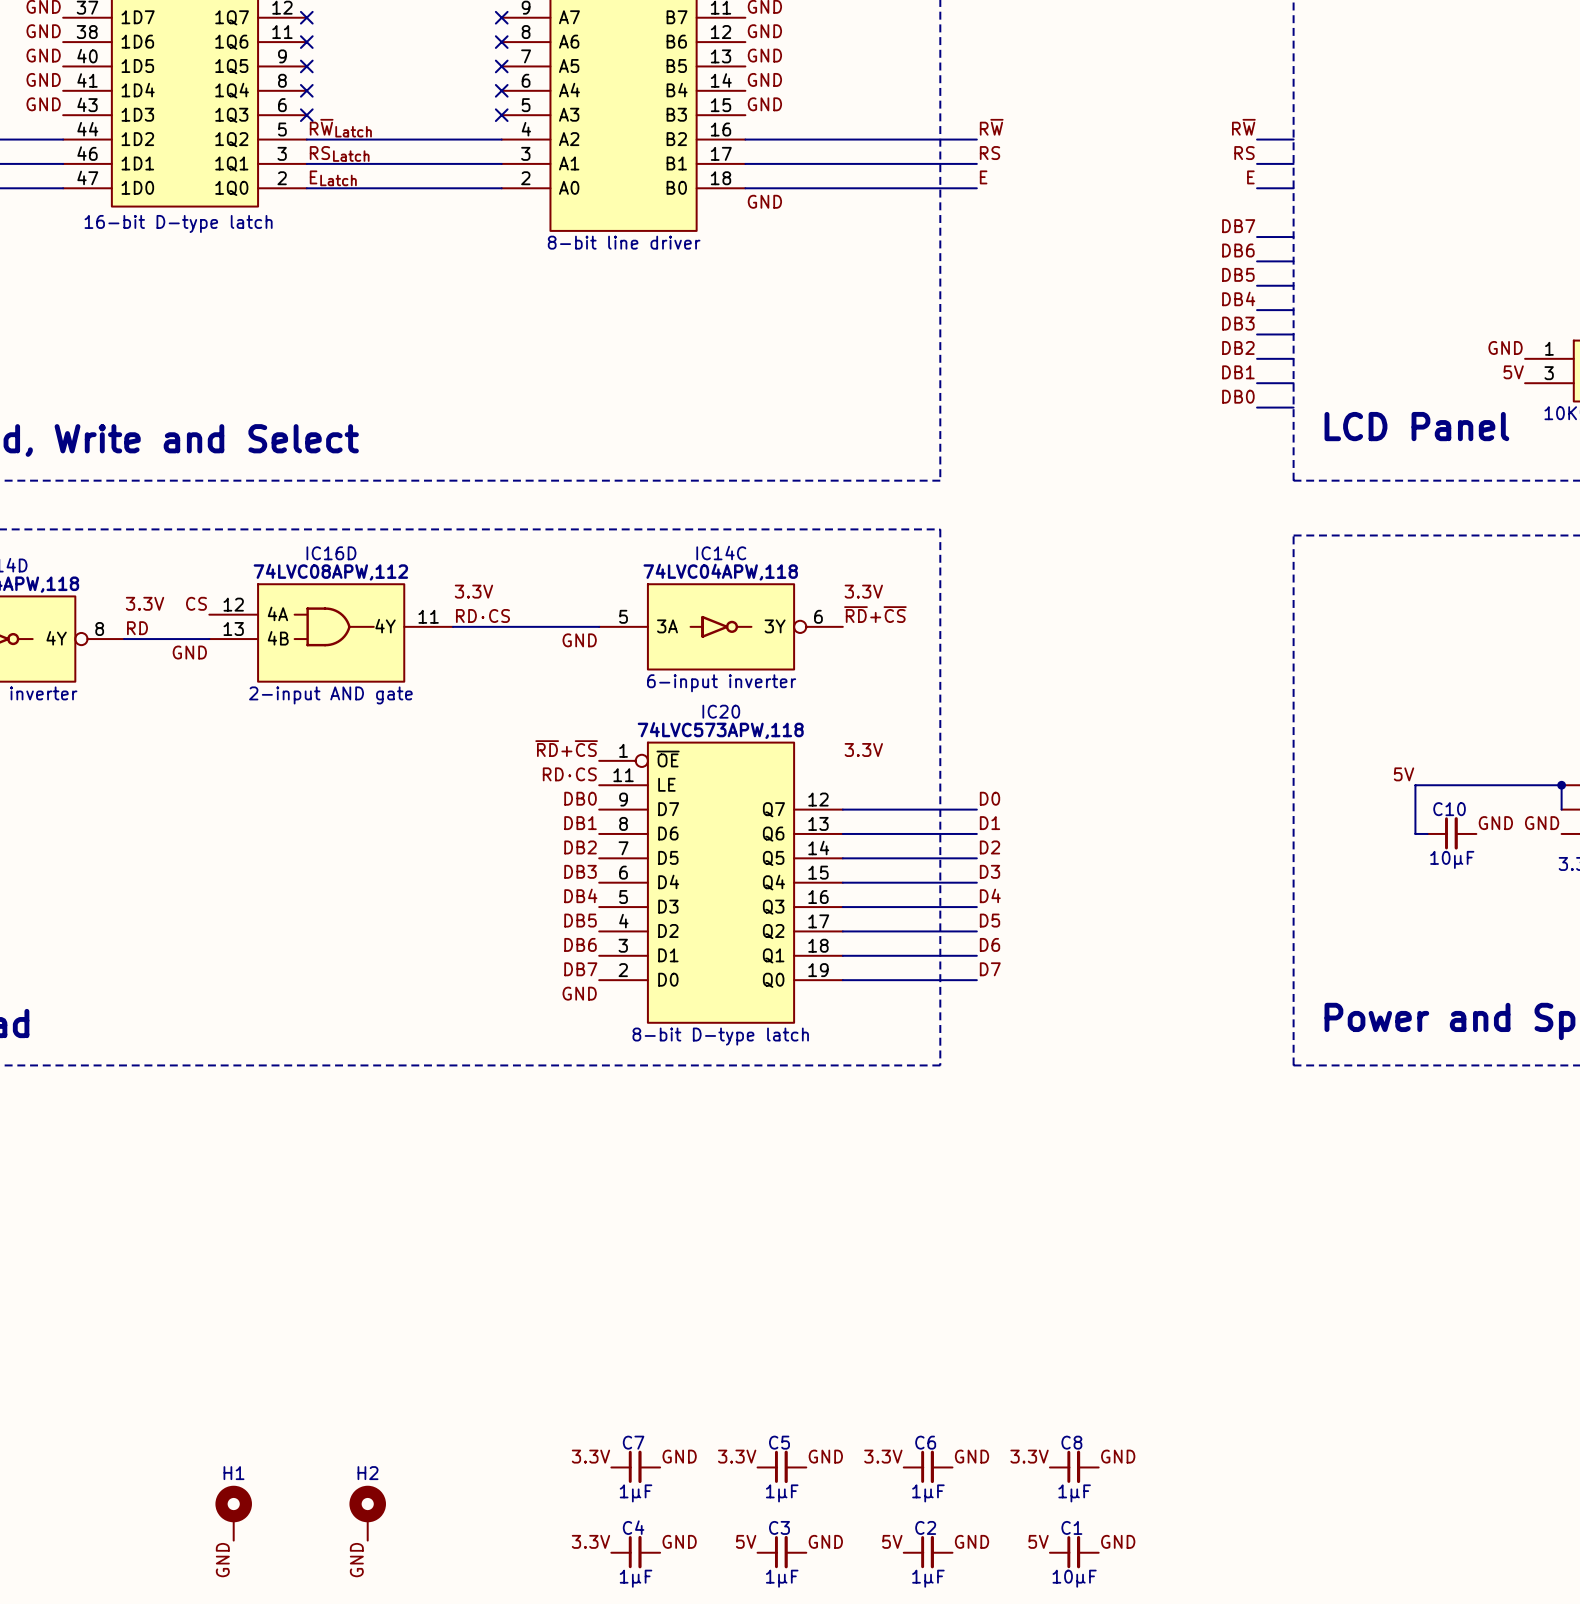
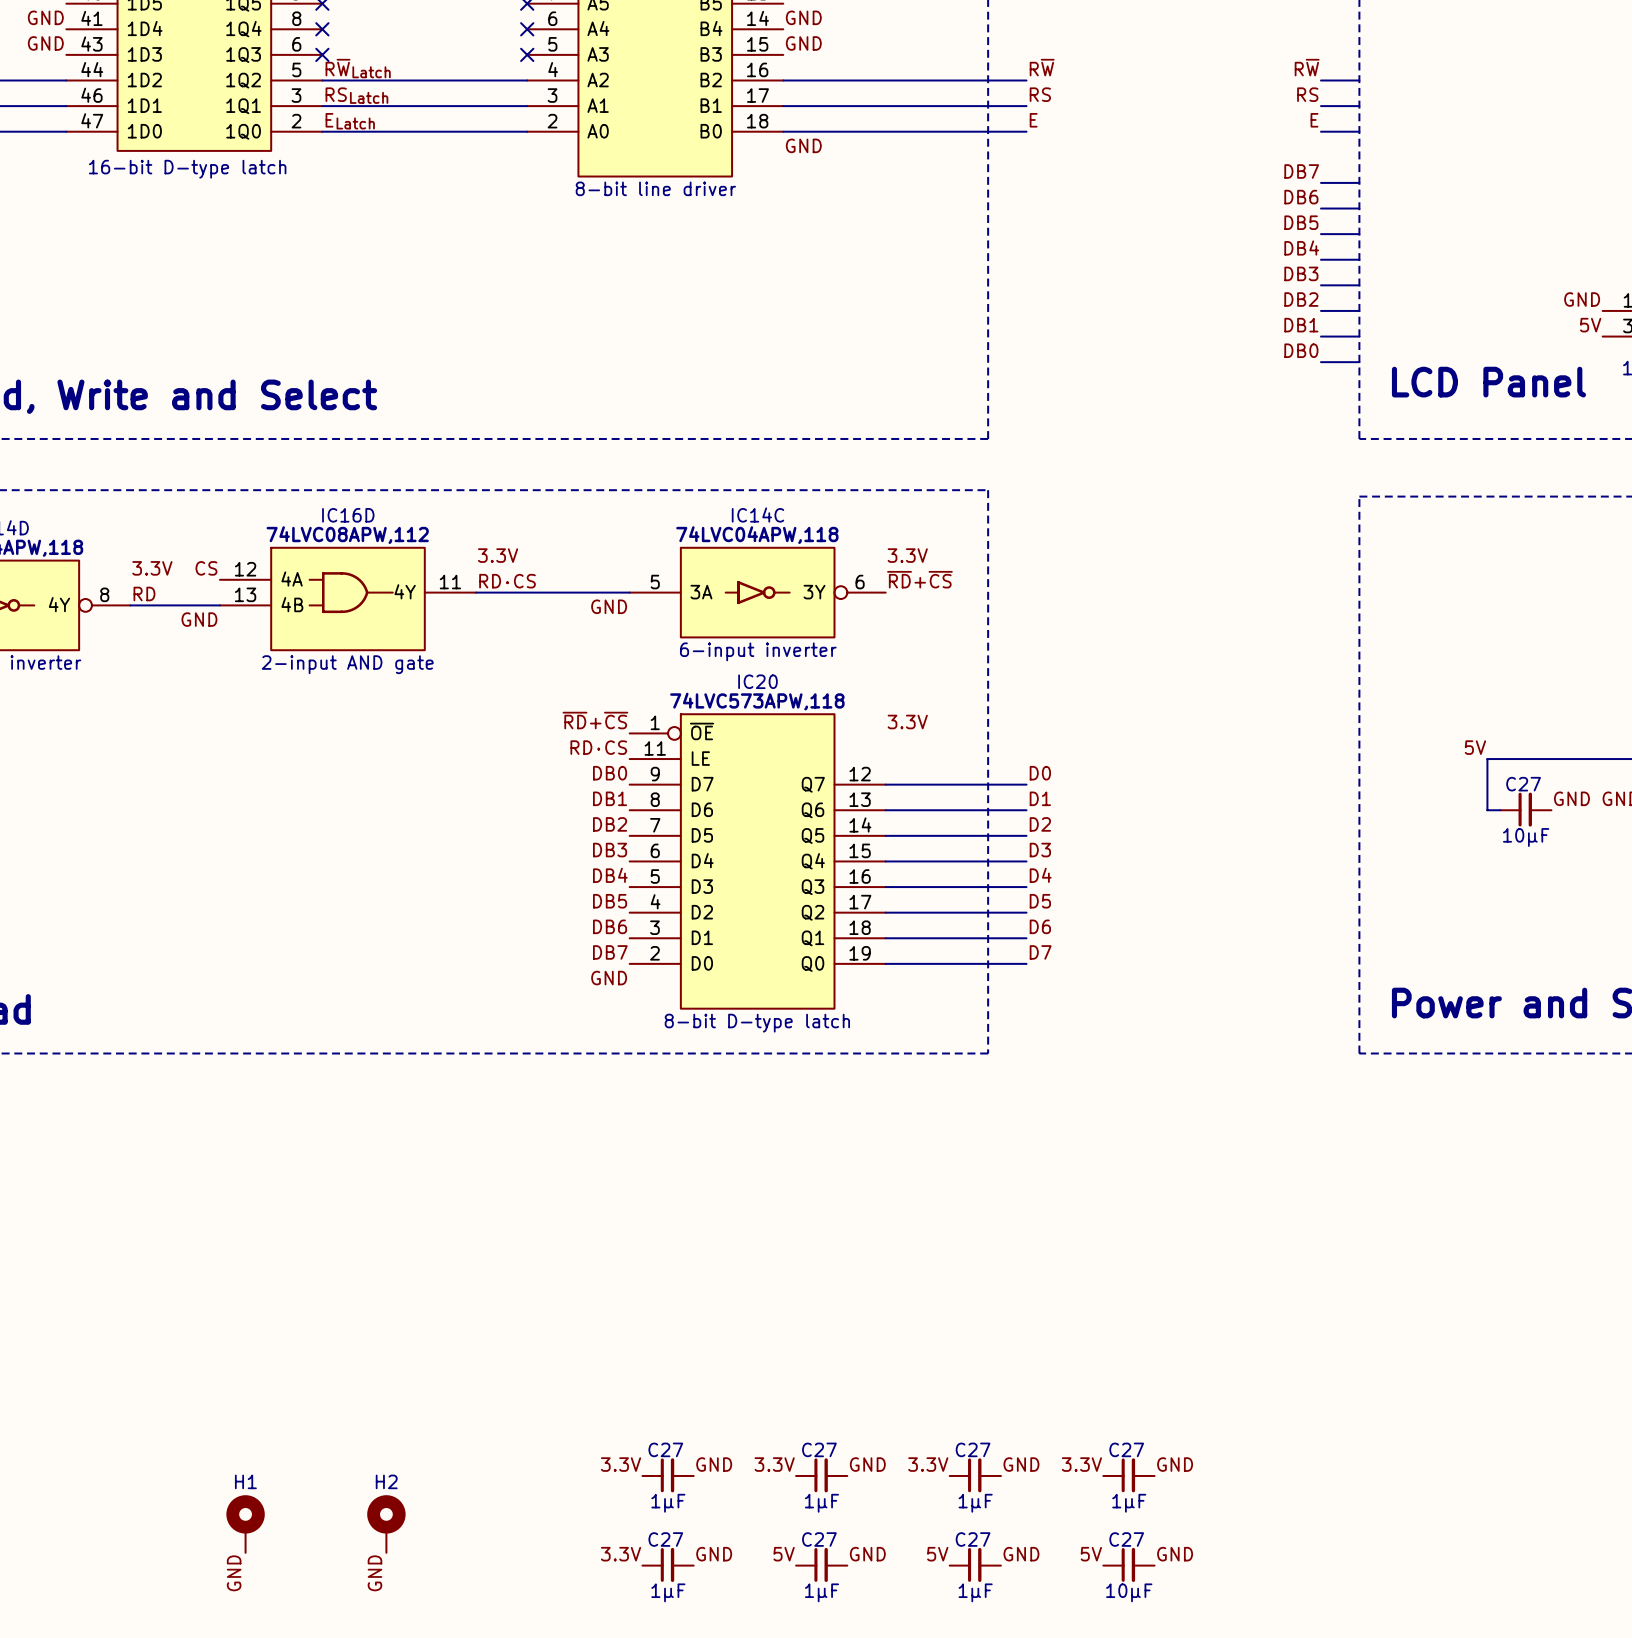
C10 name: C10 (1449, 809) -> C27 (1523, 784)
C7 name: C7 (633, 1442) -> C27 (665, 1449)
C5 name: C5 (779, 1442) -> C27 (819, 1449)
C6 name: C6 (925, 1442) -> C27 (973, 1449)
C8 name: C8 (1071, 1442) -> C27 (1126, 1449)
C4 name: C4 (633, 1527) -> C27 (665, 1539)
C3 name: C3 (779, 1527) -> C27 (819, 1539)
C2 name: C2 (925, 1527) -> C27 (973, 1539)
C1 name: C1 (1071, 1527) -> C27 (1126, 1539)

